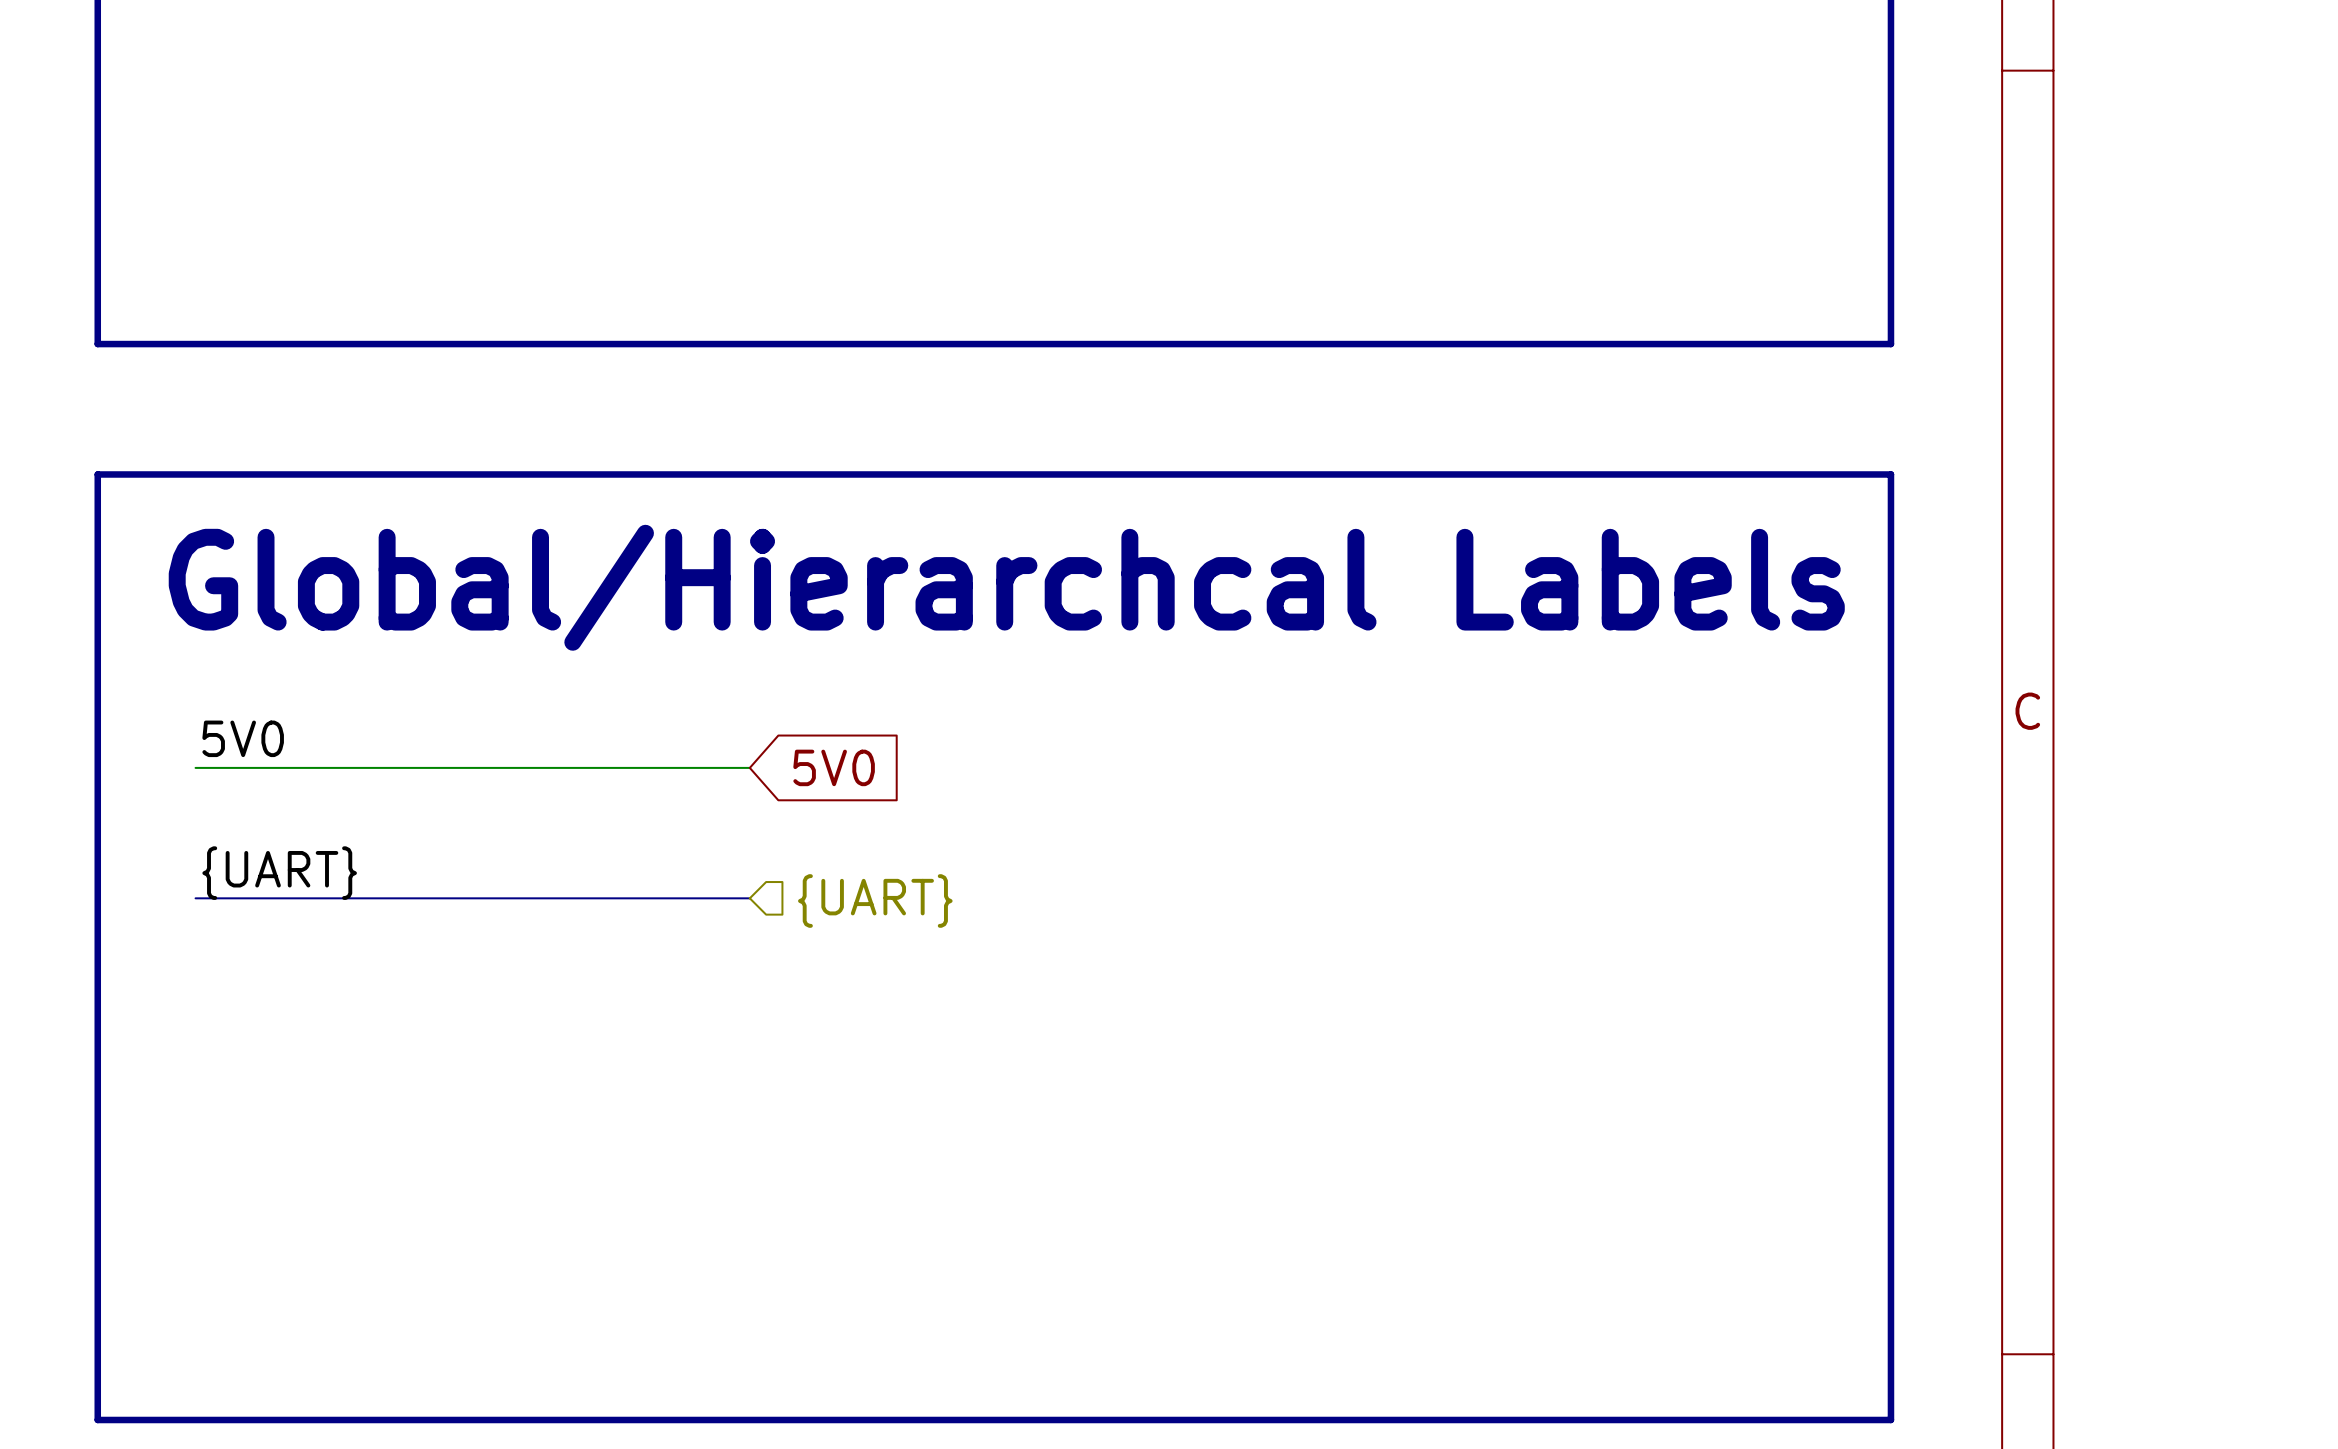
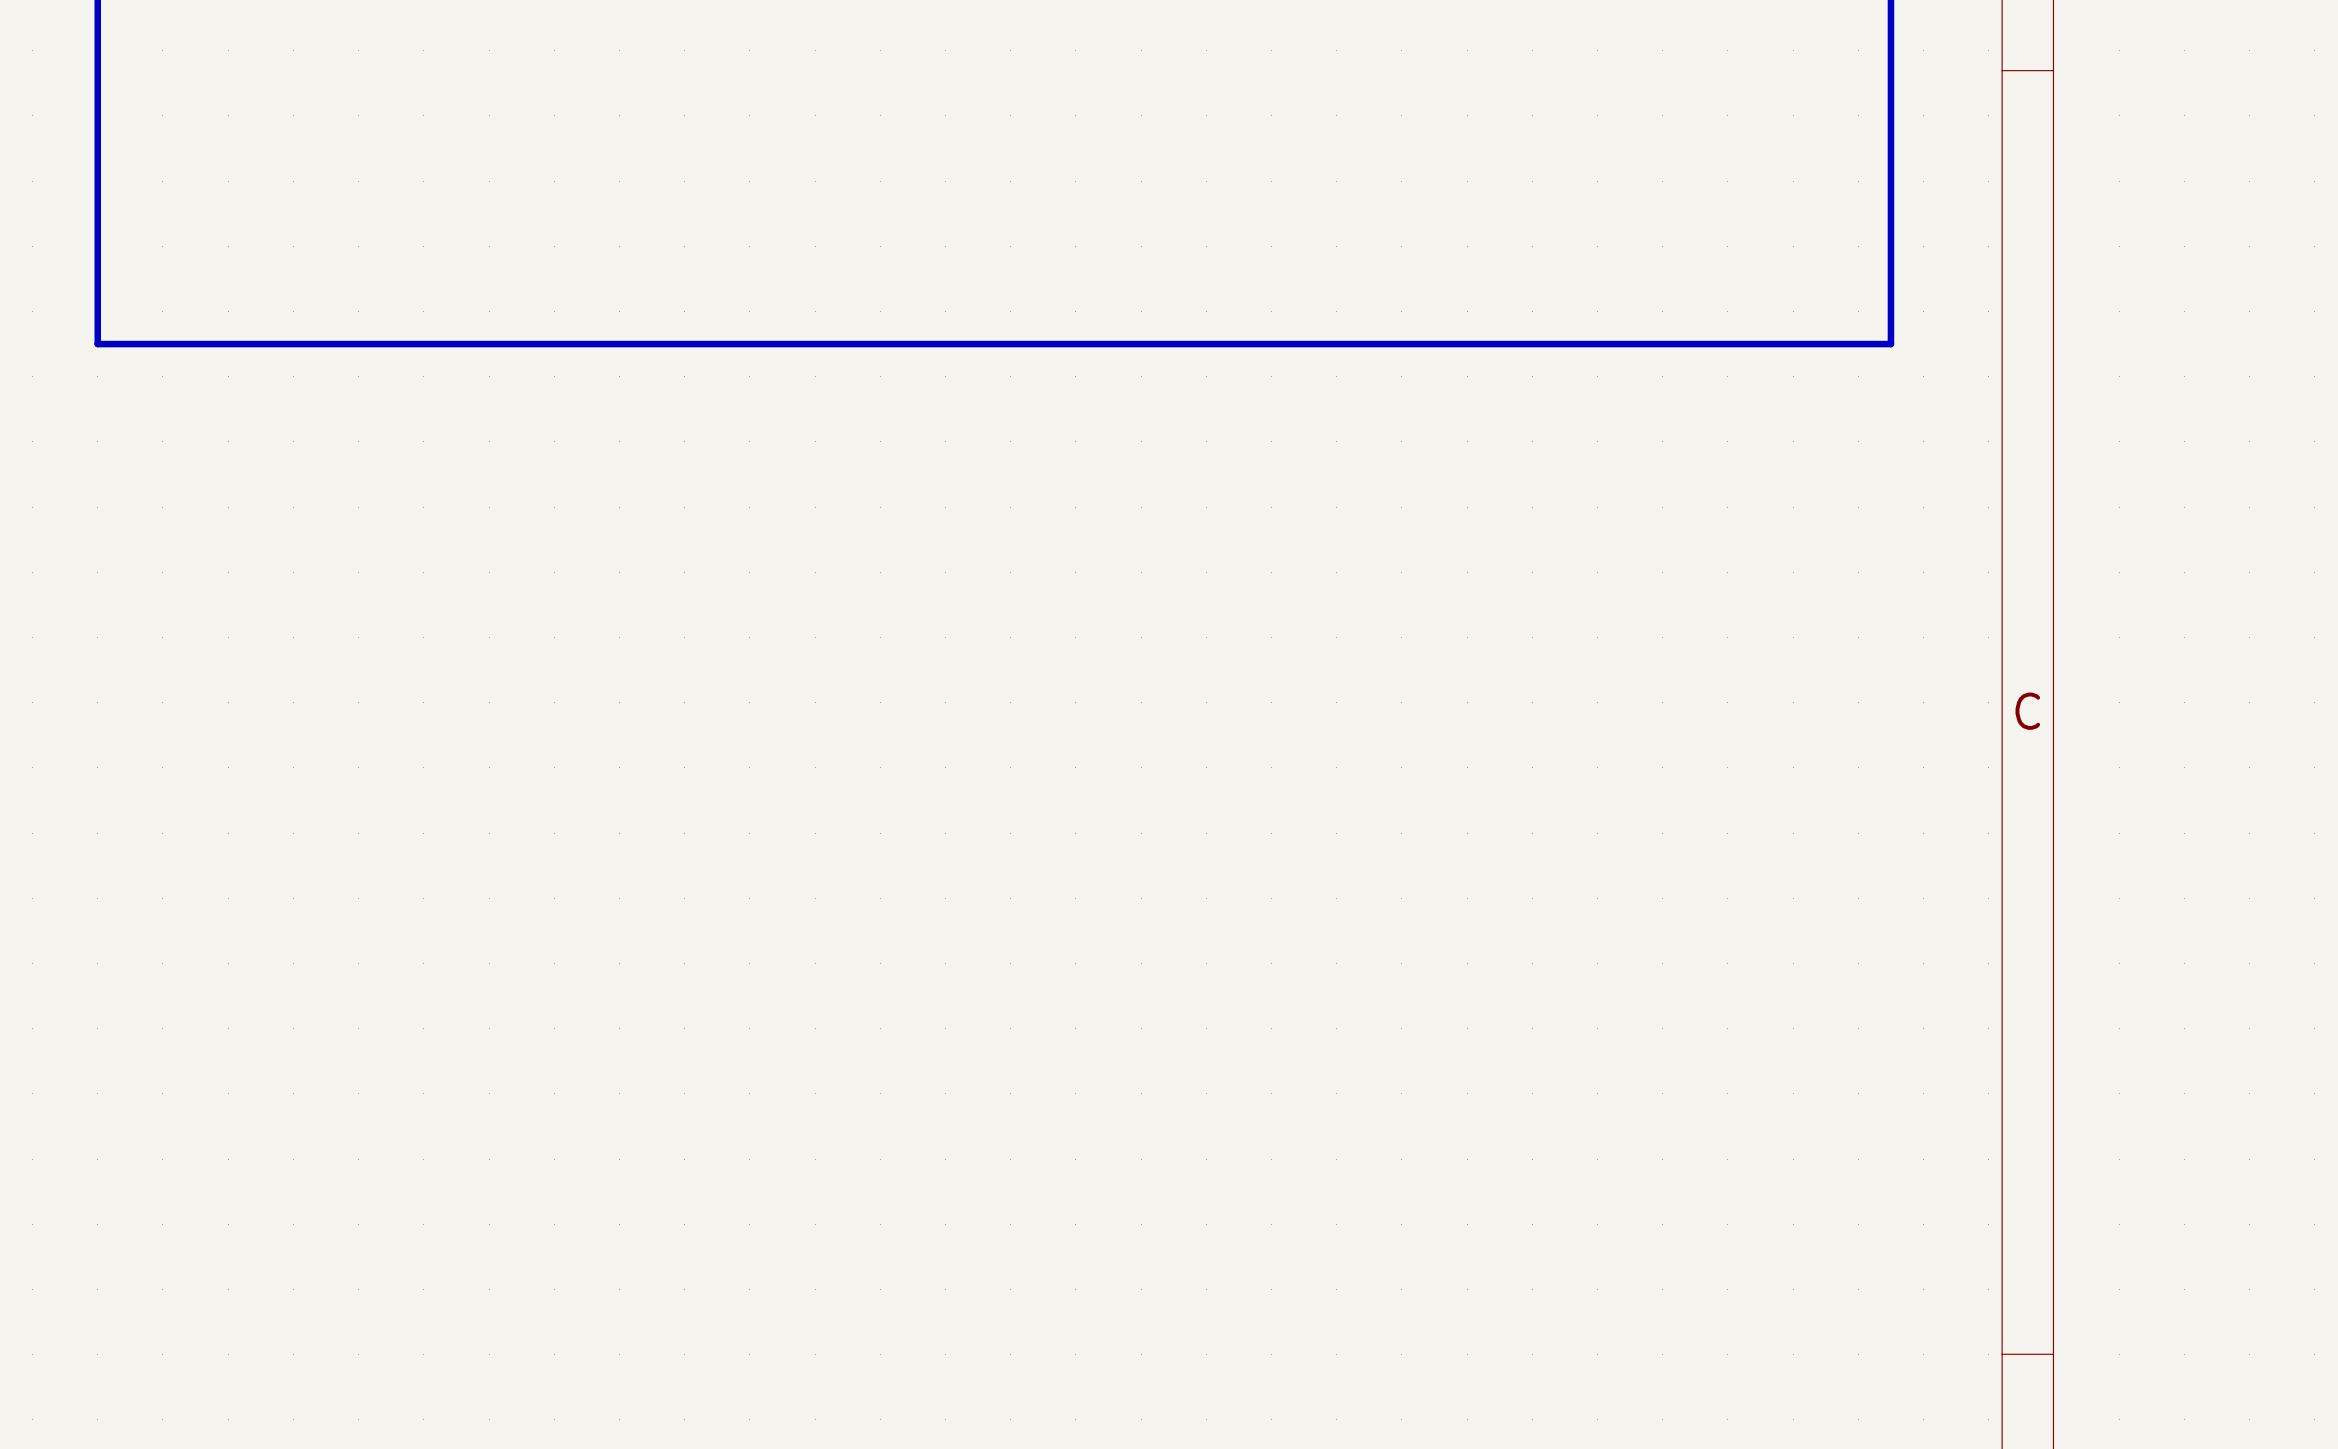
line: (97, 474) (1890, 474) (1890, 1419) (97, 1419) (97, 474) -> none
text: Global/Hierarchcal Labels (1006, 587) -> none
label: 5V0 (243, 738) -> none
wire: (195, 767) (749, 767) -> none
global label: 5V0 (834, 767) -> none
label: {UART} (279, 873) -> none
bus: (195, 898) (749, 898) -> none
hierarchical label: {UART} (875, 900) -> none

